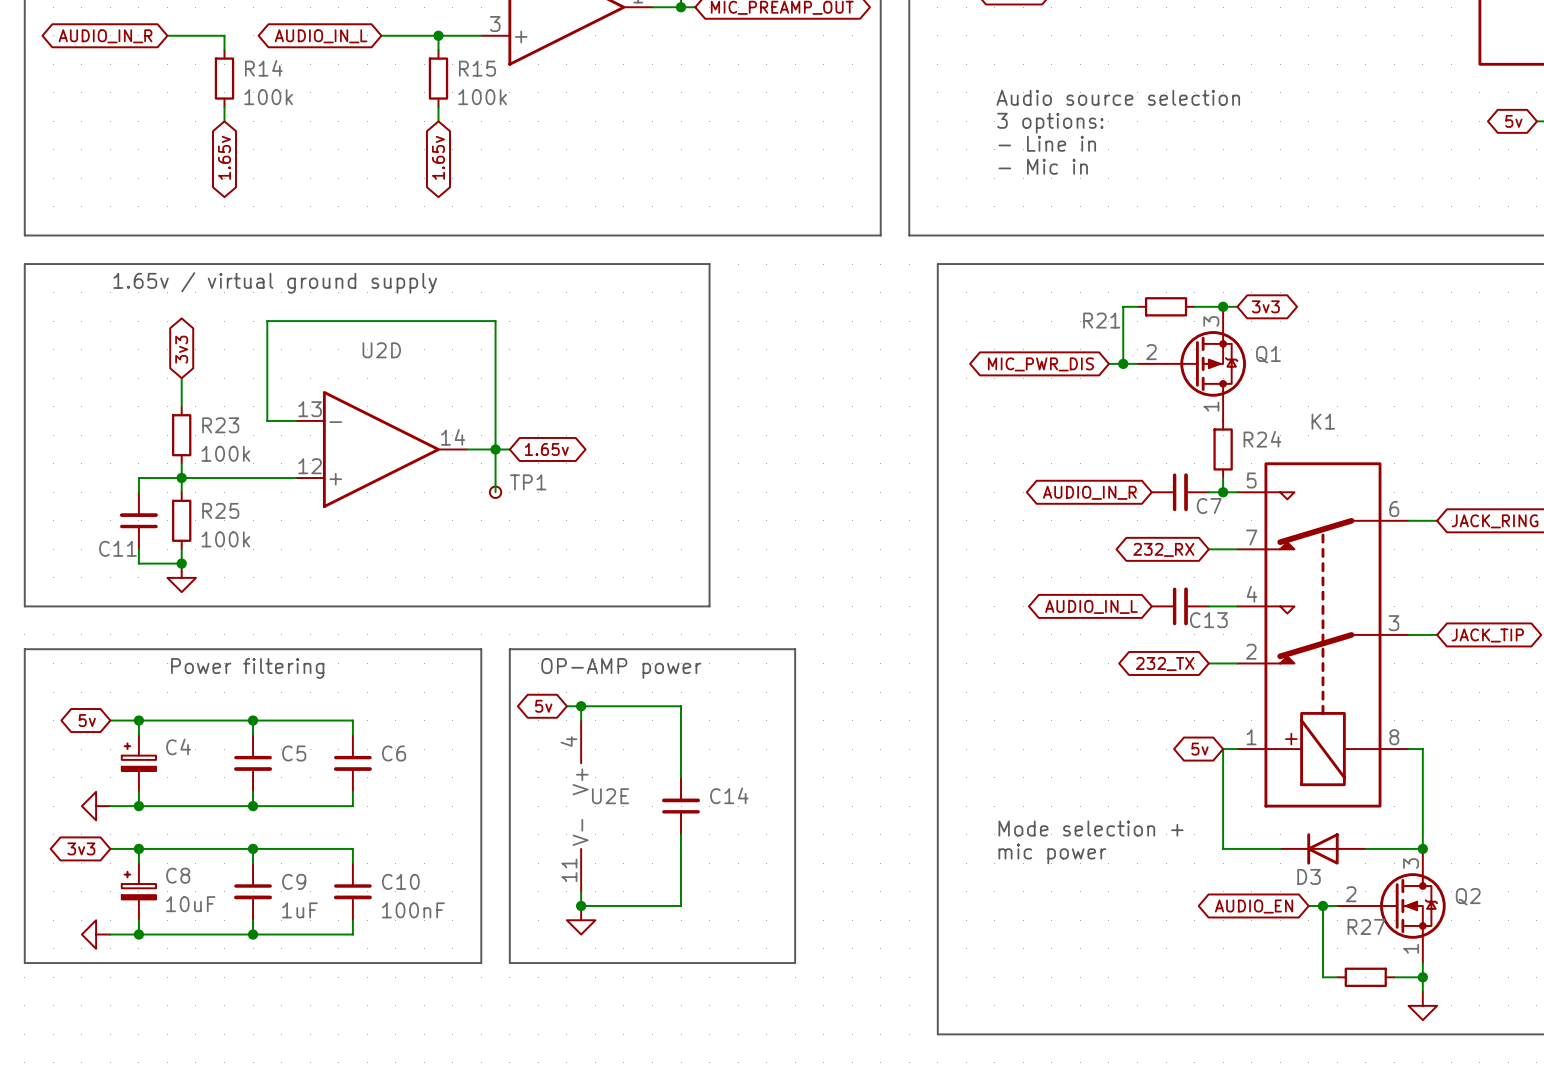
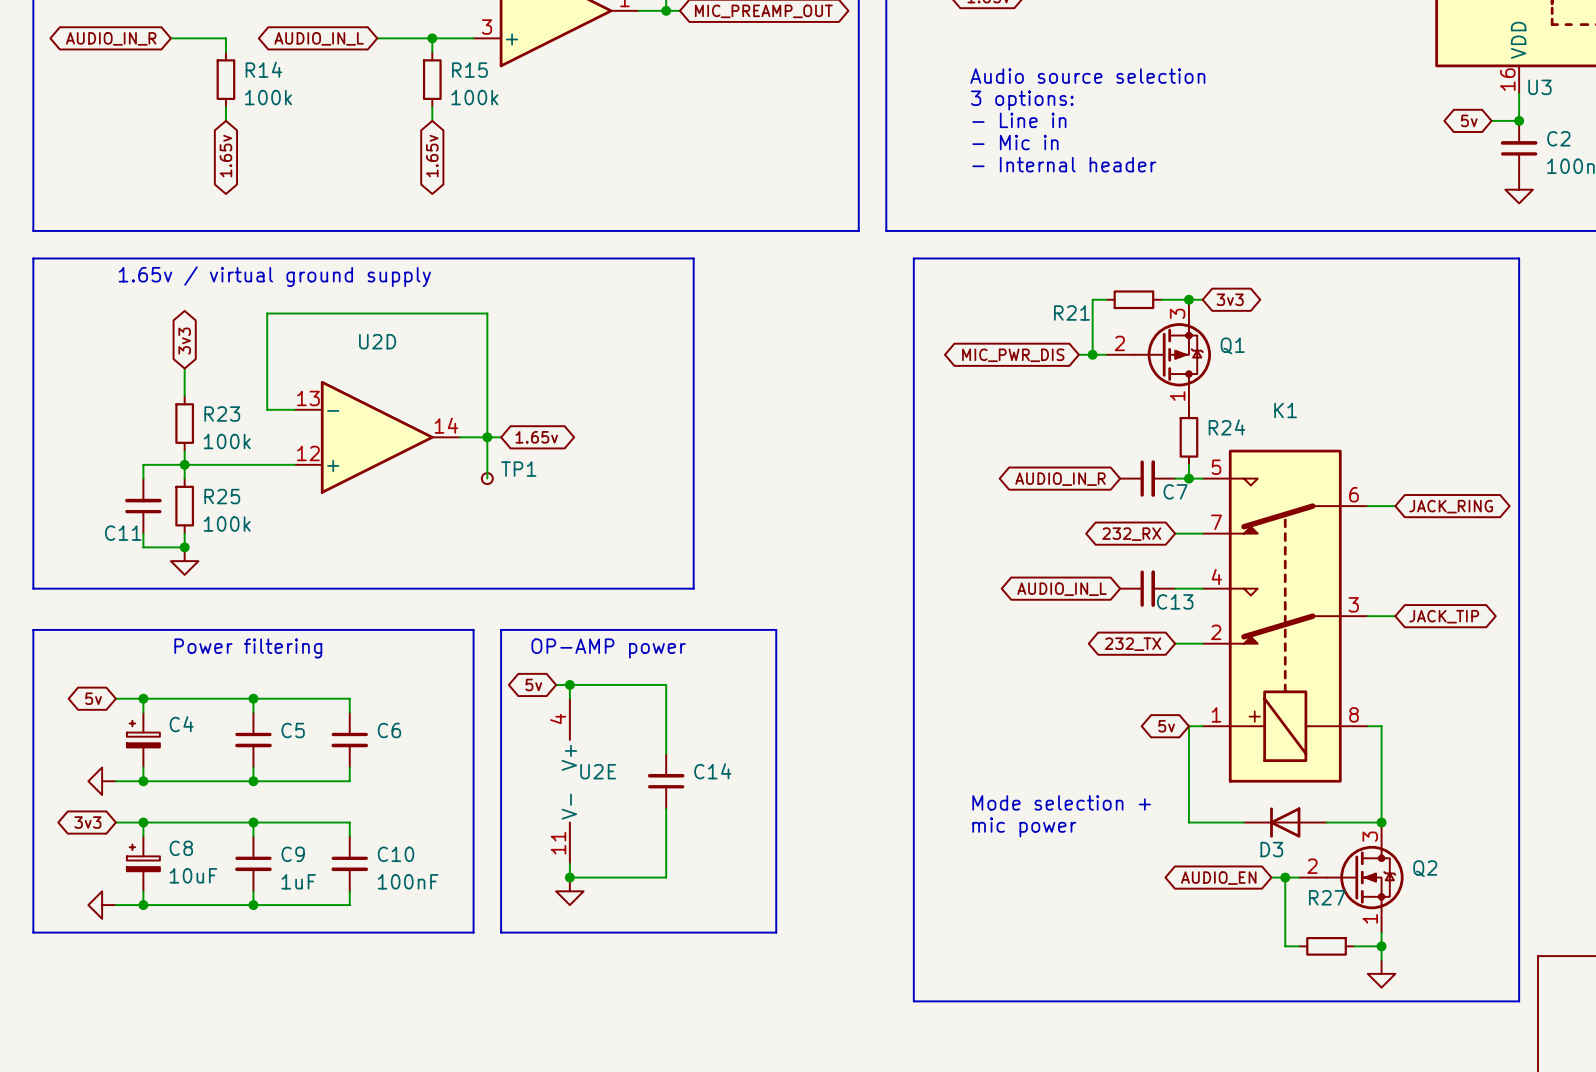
text: none -> Audio source selection (1087, 76)
text: Audio source selection (1118, 97) -> 3 options: (1022, 100)
text: 3 options: (1050, 123) -> - Line in (1019, 120)
text: - Line in (1047, 143) -> - Mic in (1015, 142)
text: - Mic in (1043, 166) -> - Internal header (1064, 164)

